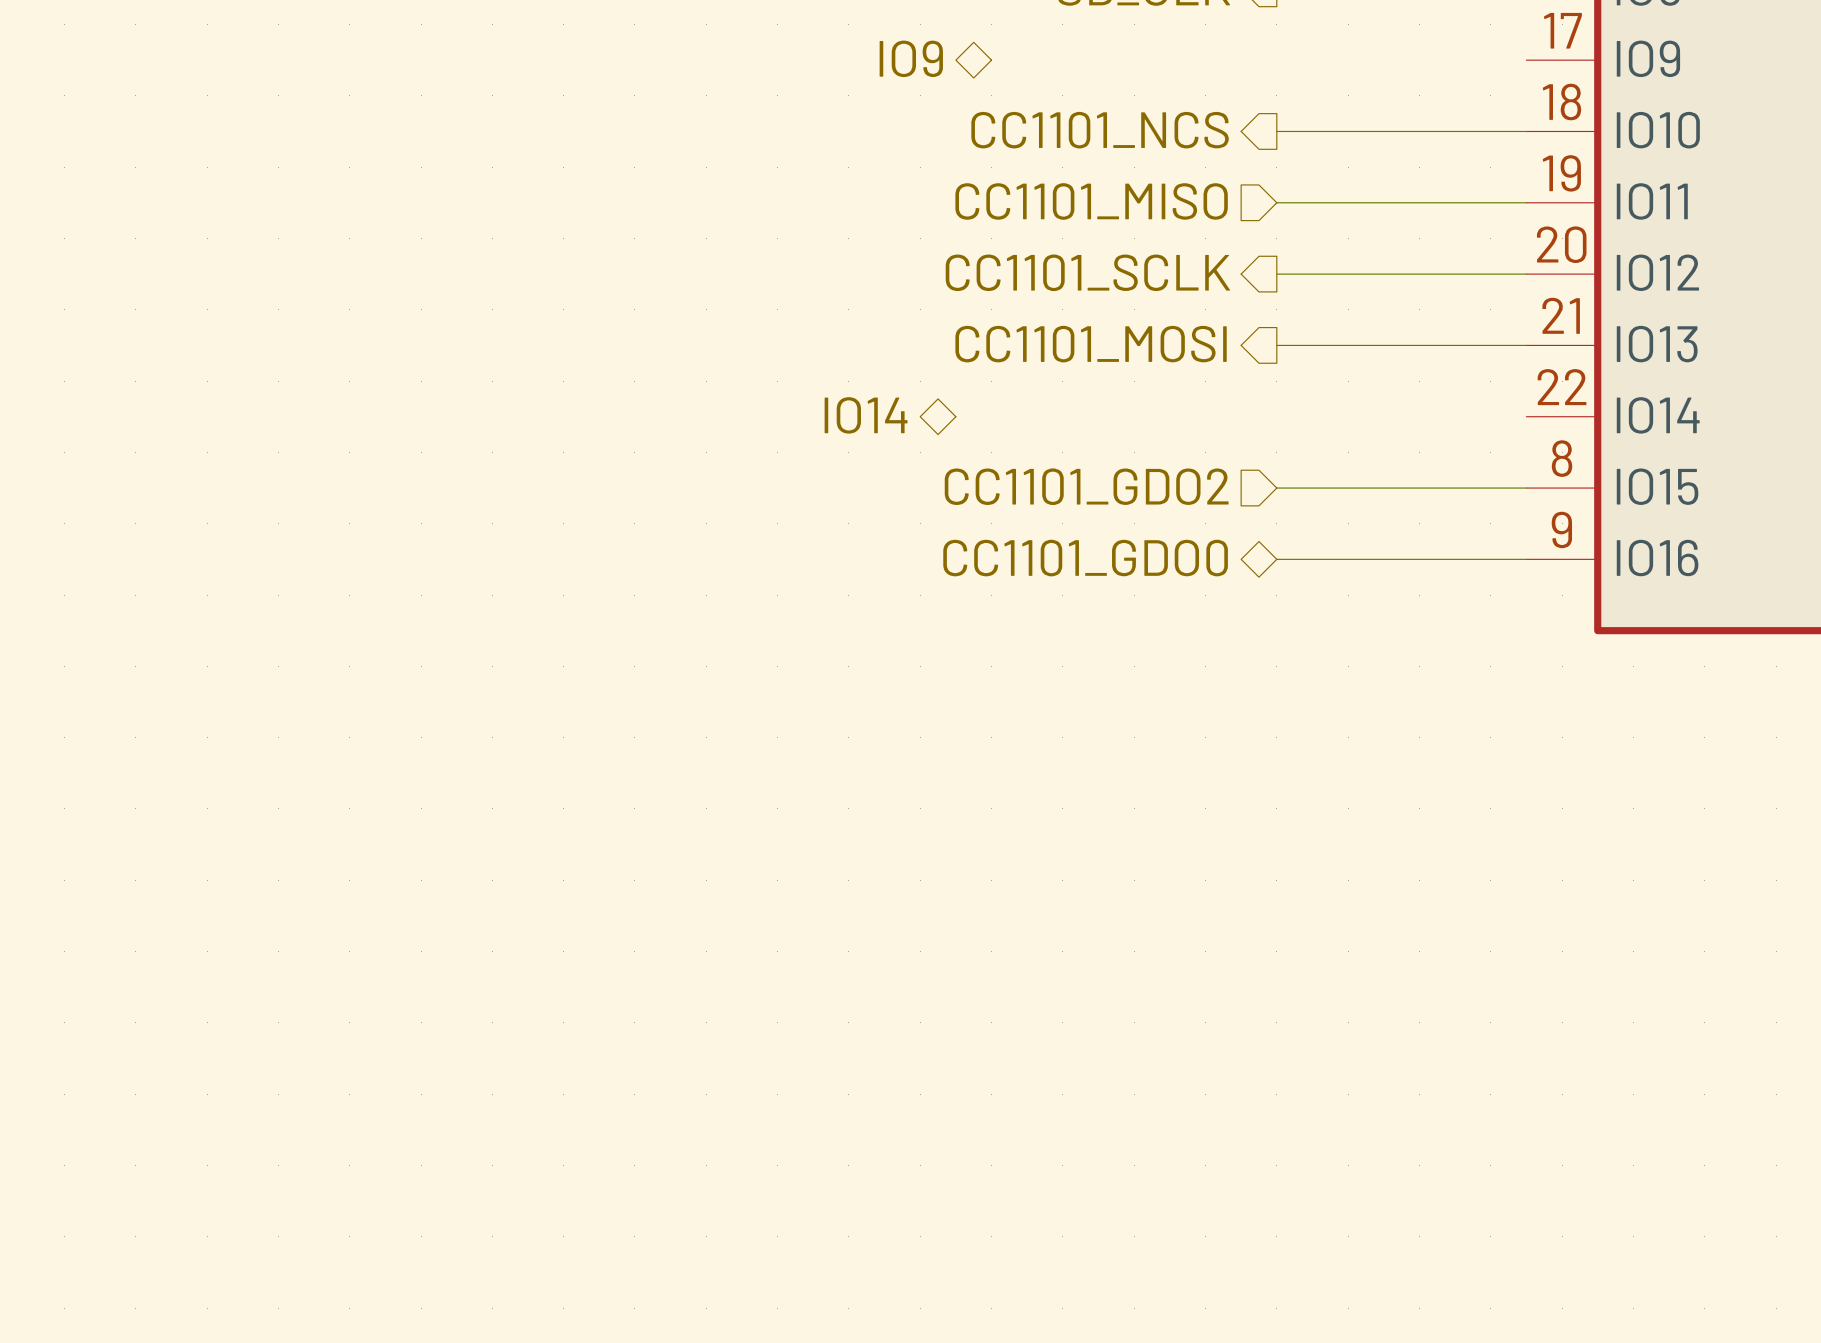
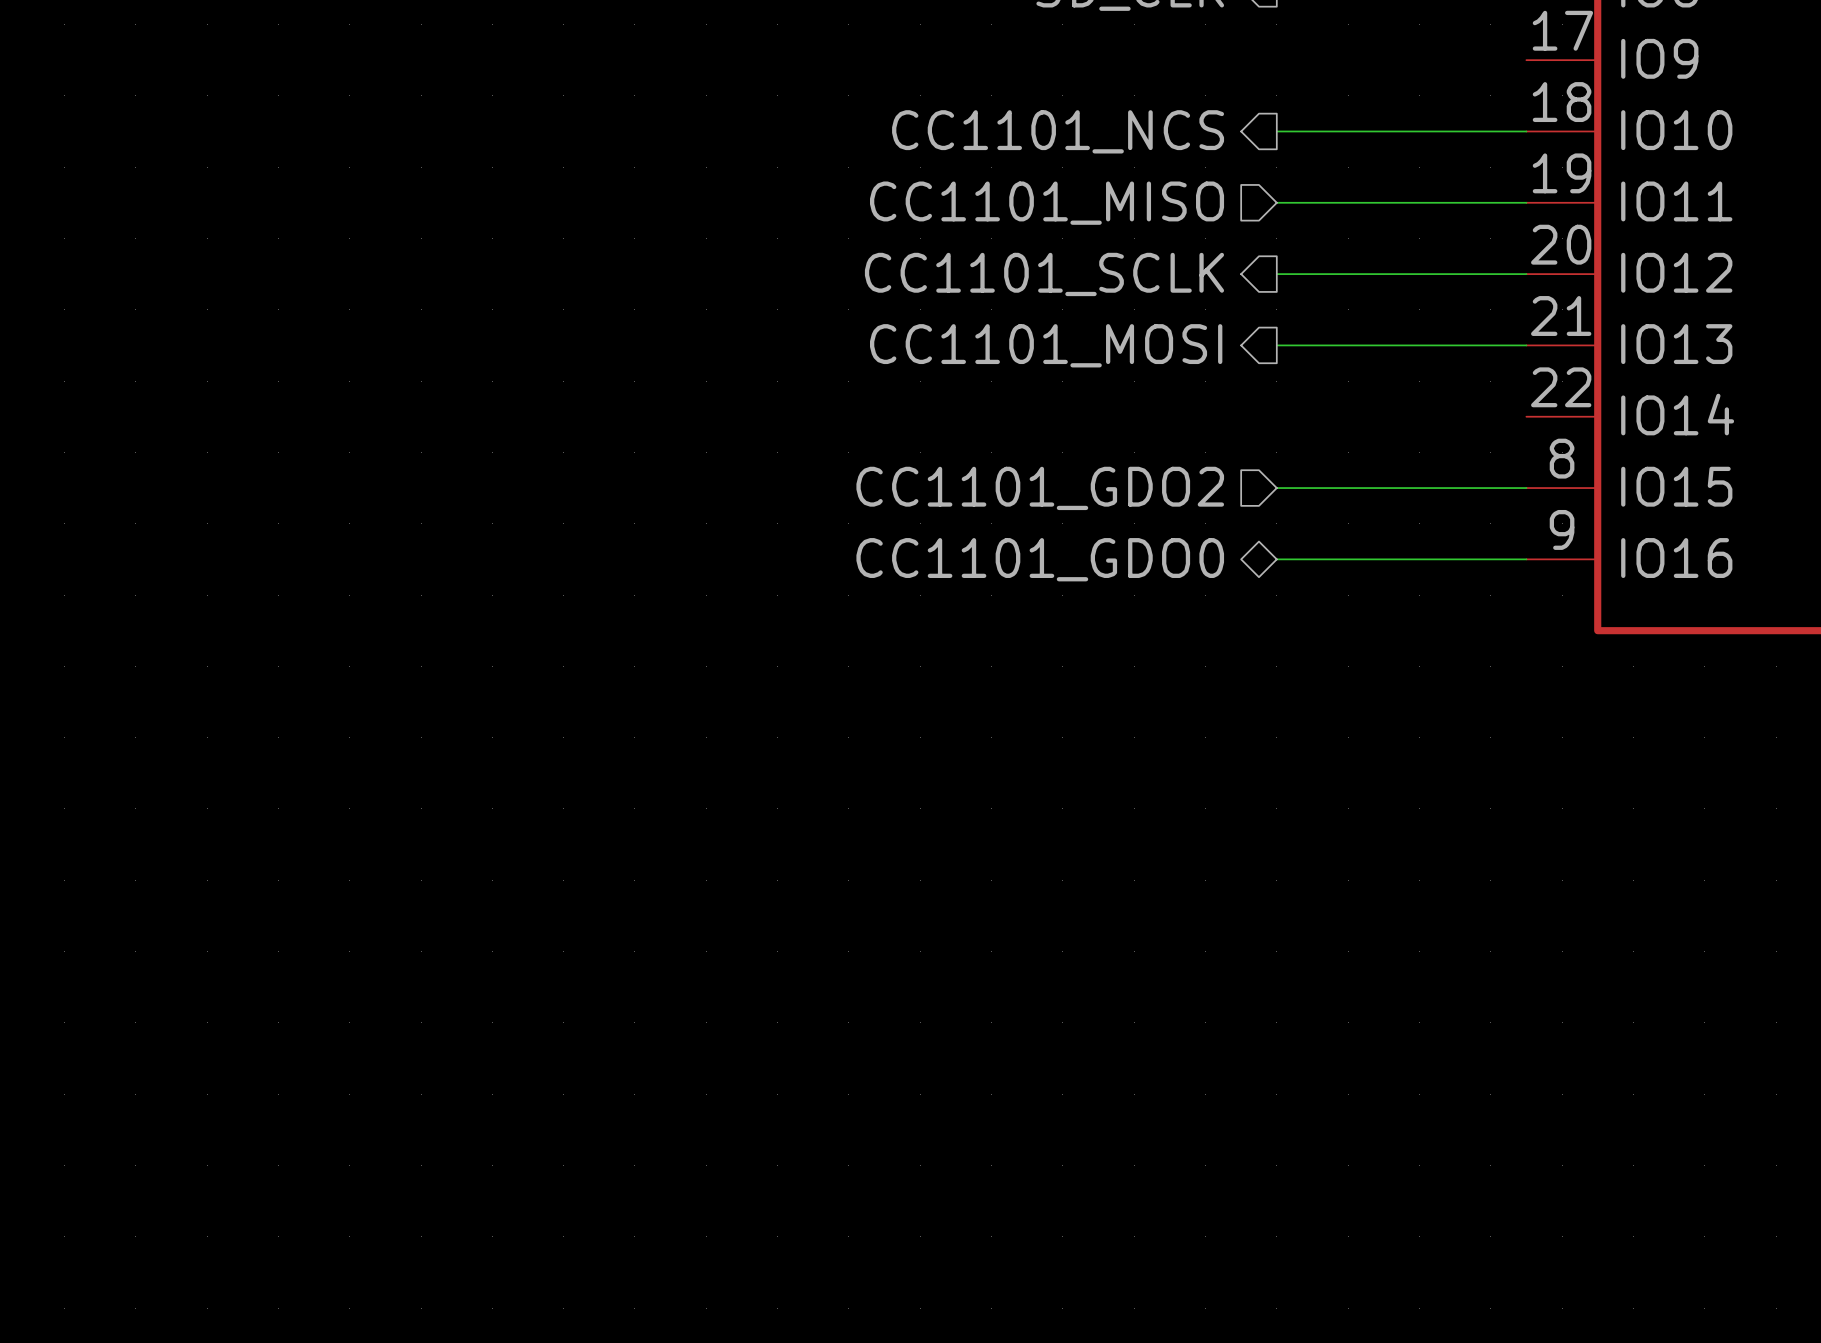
hierarchical label: IO9 (911, 58) -> none
hierarchical label: IO14 (866, 415) -> none

